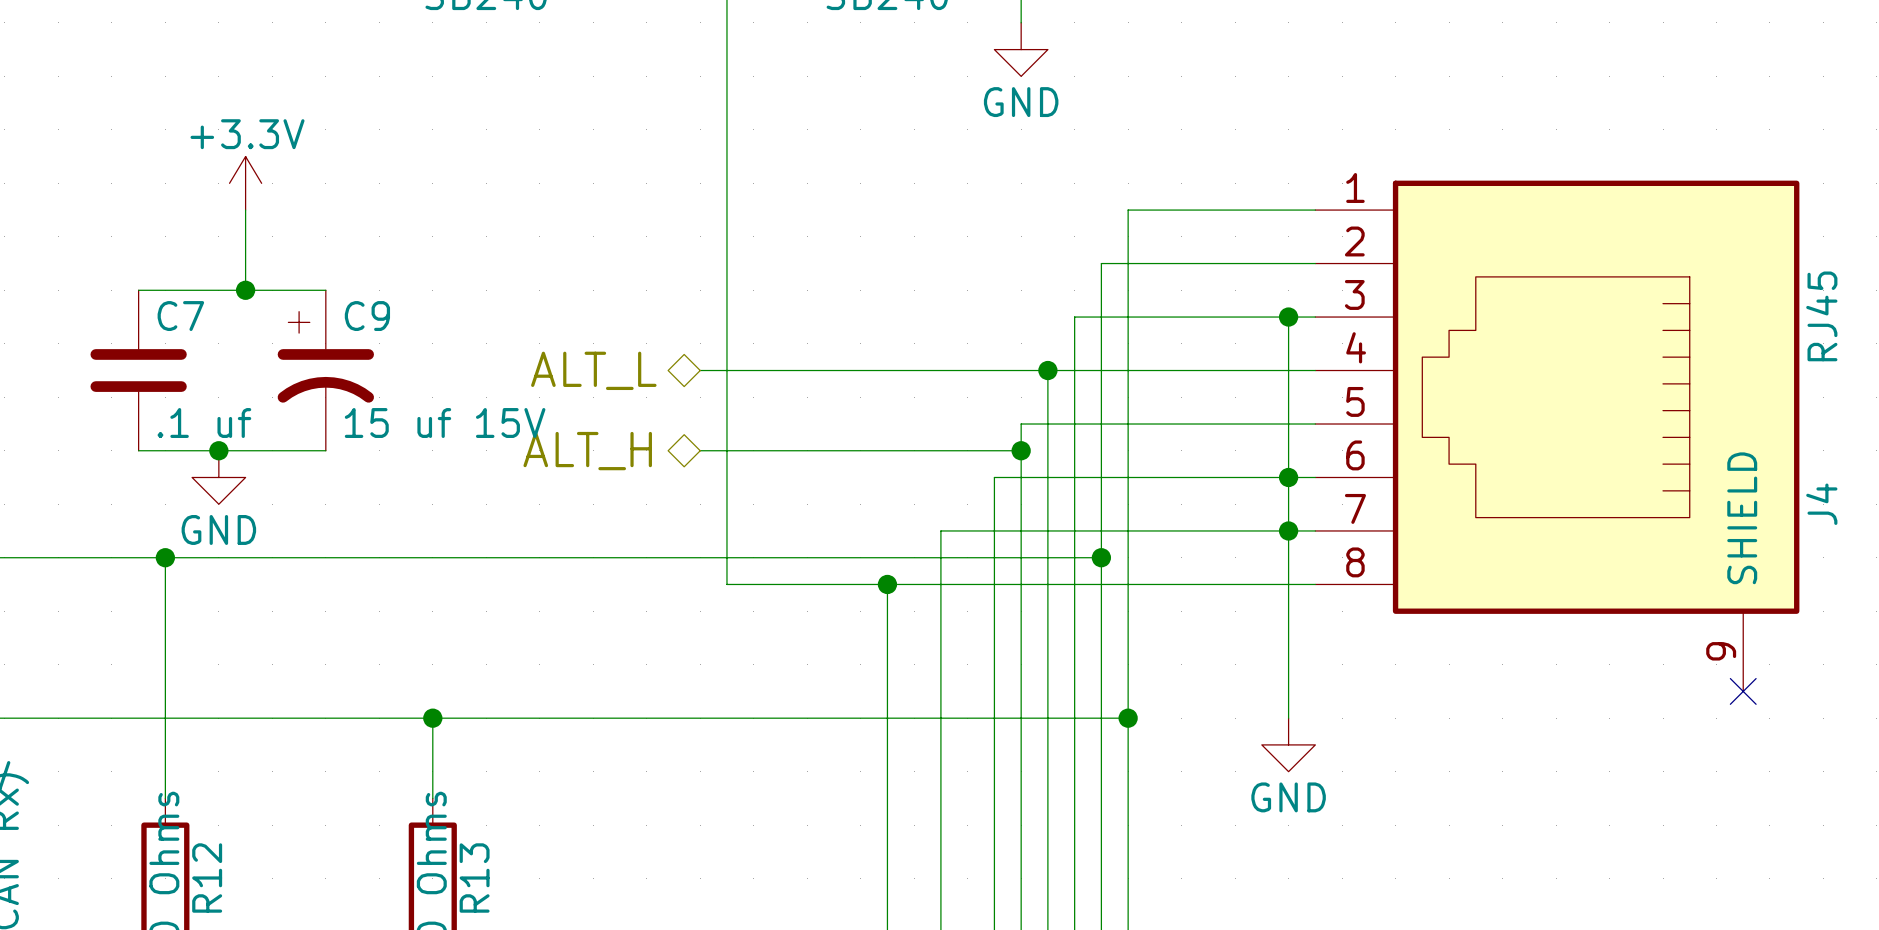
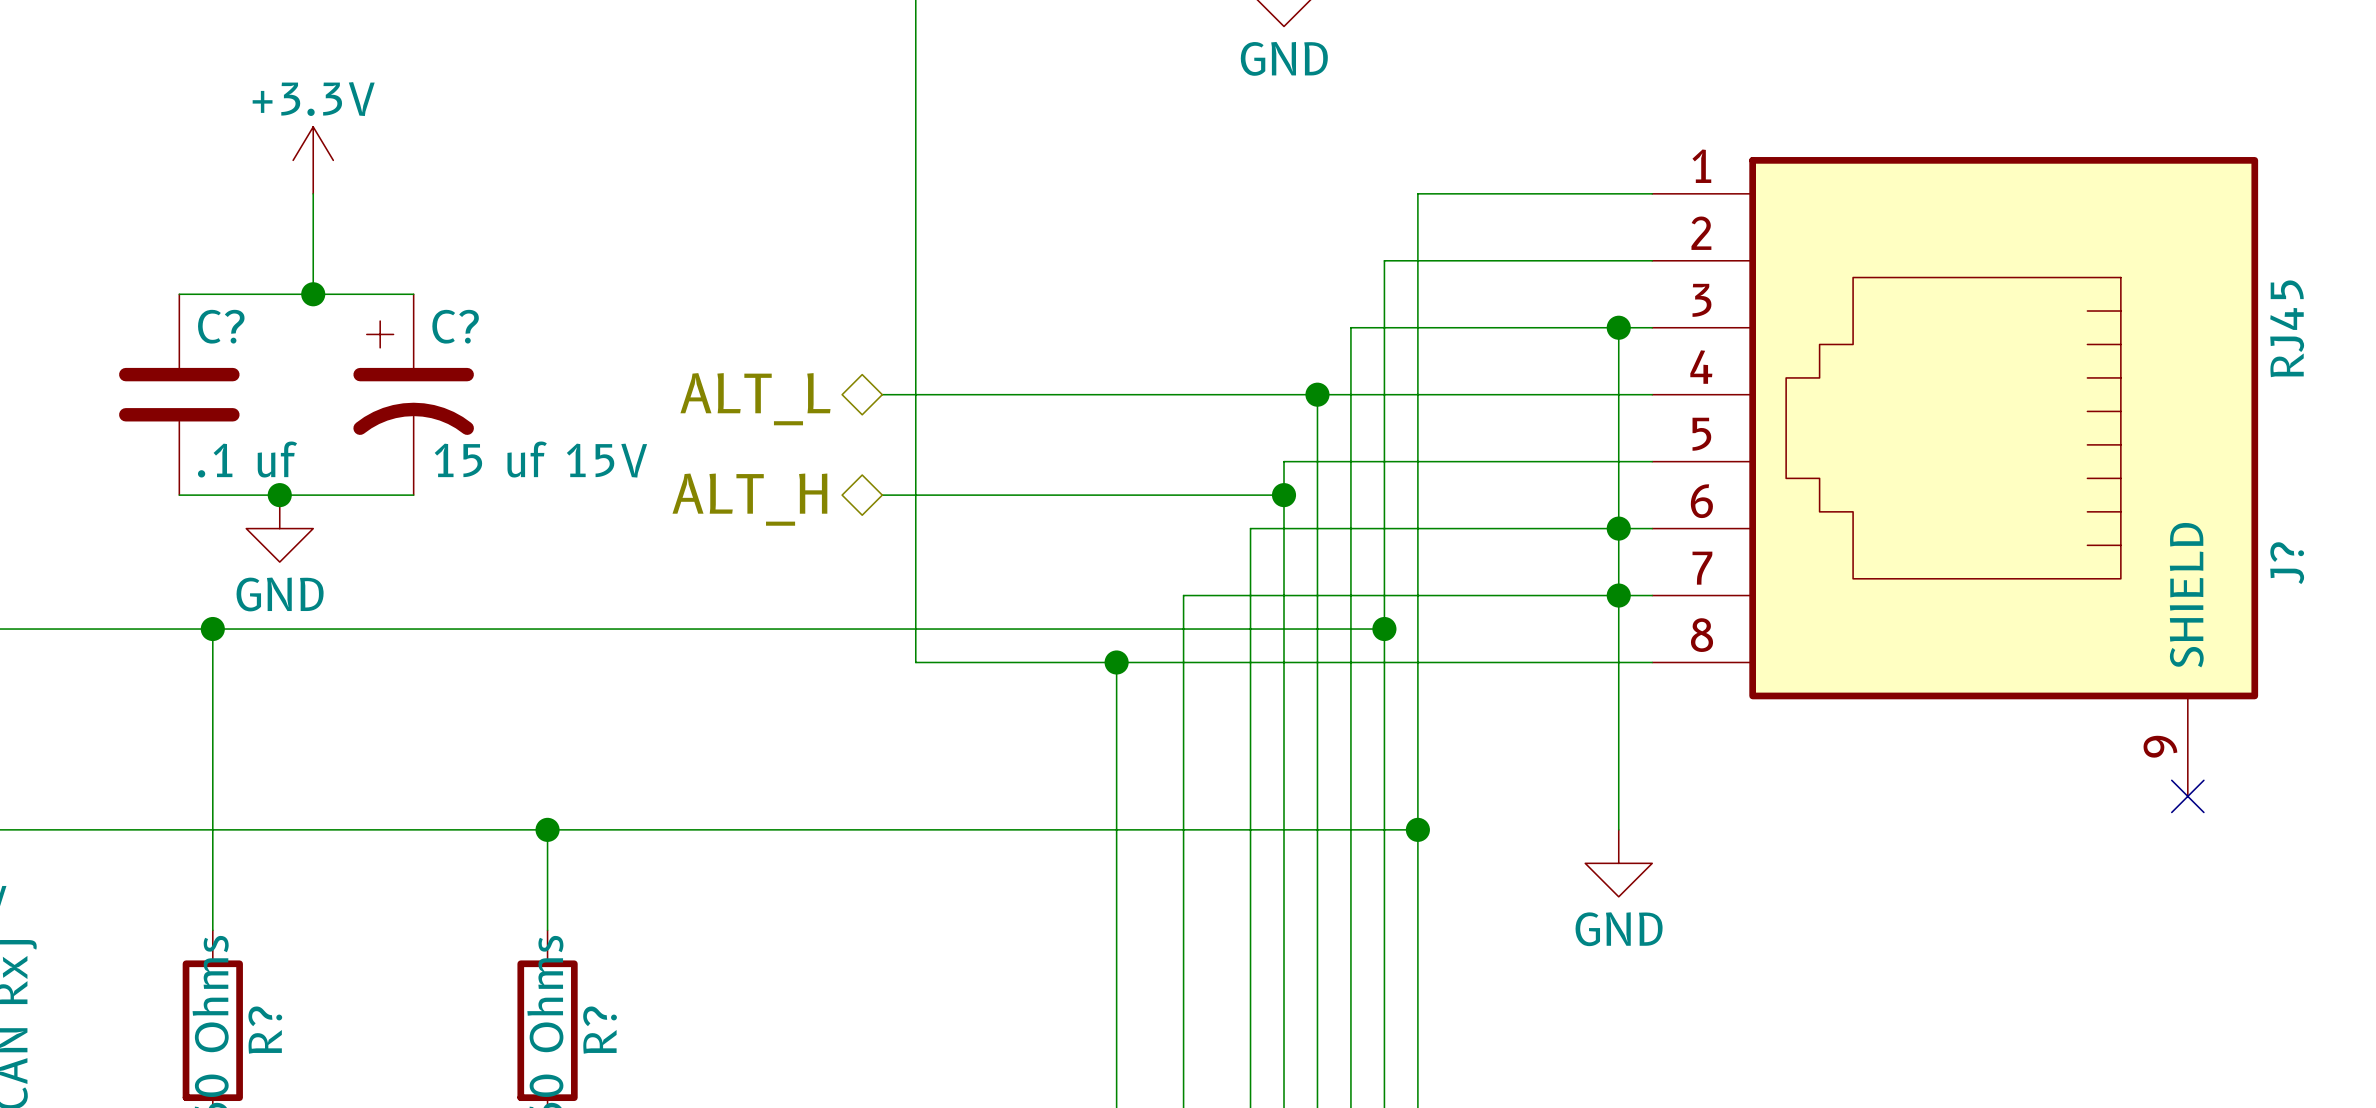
C7 name: C7 (180, 316) -> C? (221, 326)
C9 name: C9 (367, 316) -> C? (455, 326)
J4 name: J4 (1821, 504) -> J? (2287, 563)
R12 name: R12 (207, 878) -> R? (265, 1030)
R13 name: R13 (474, 878) -> R? (600, 1030)

